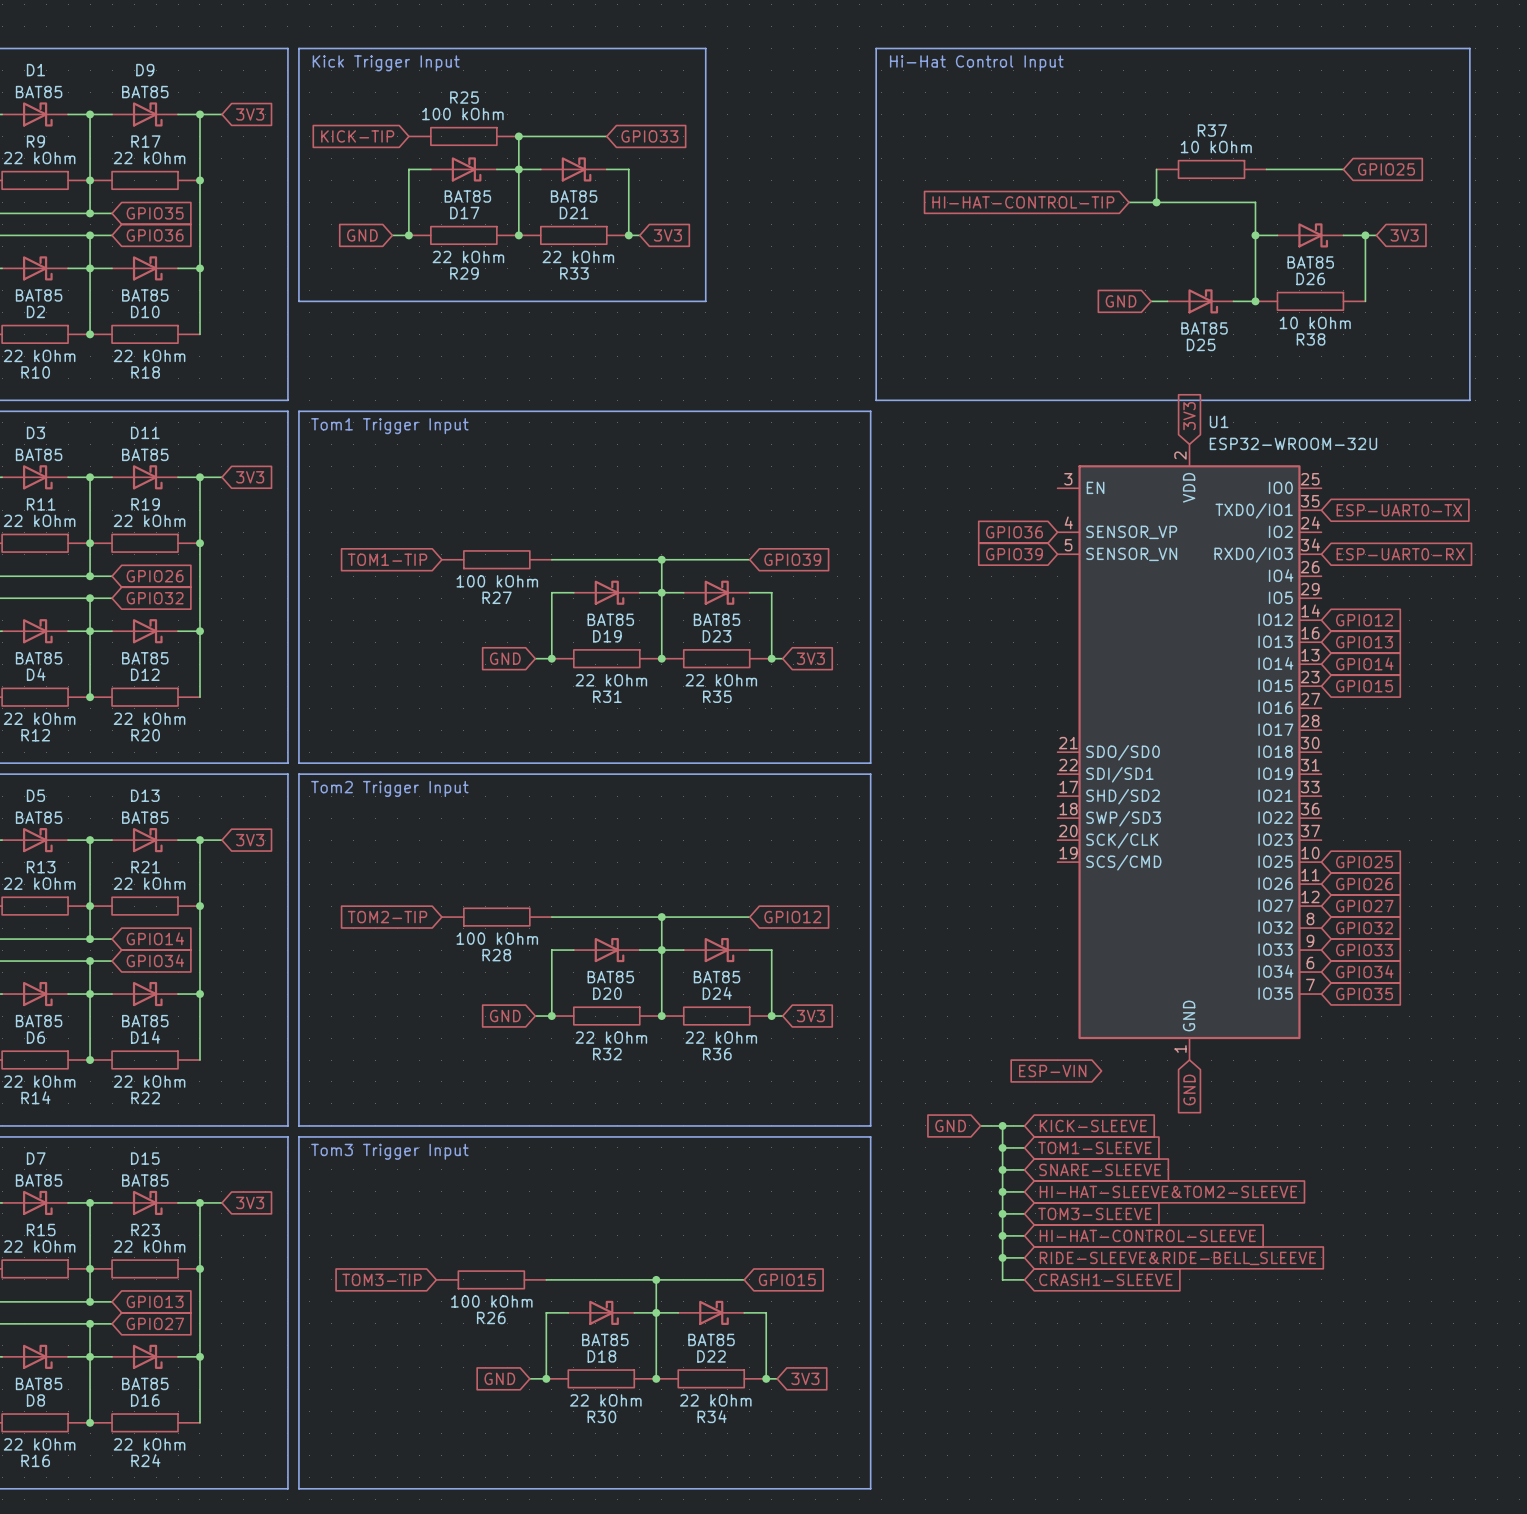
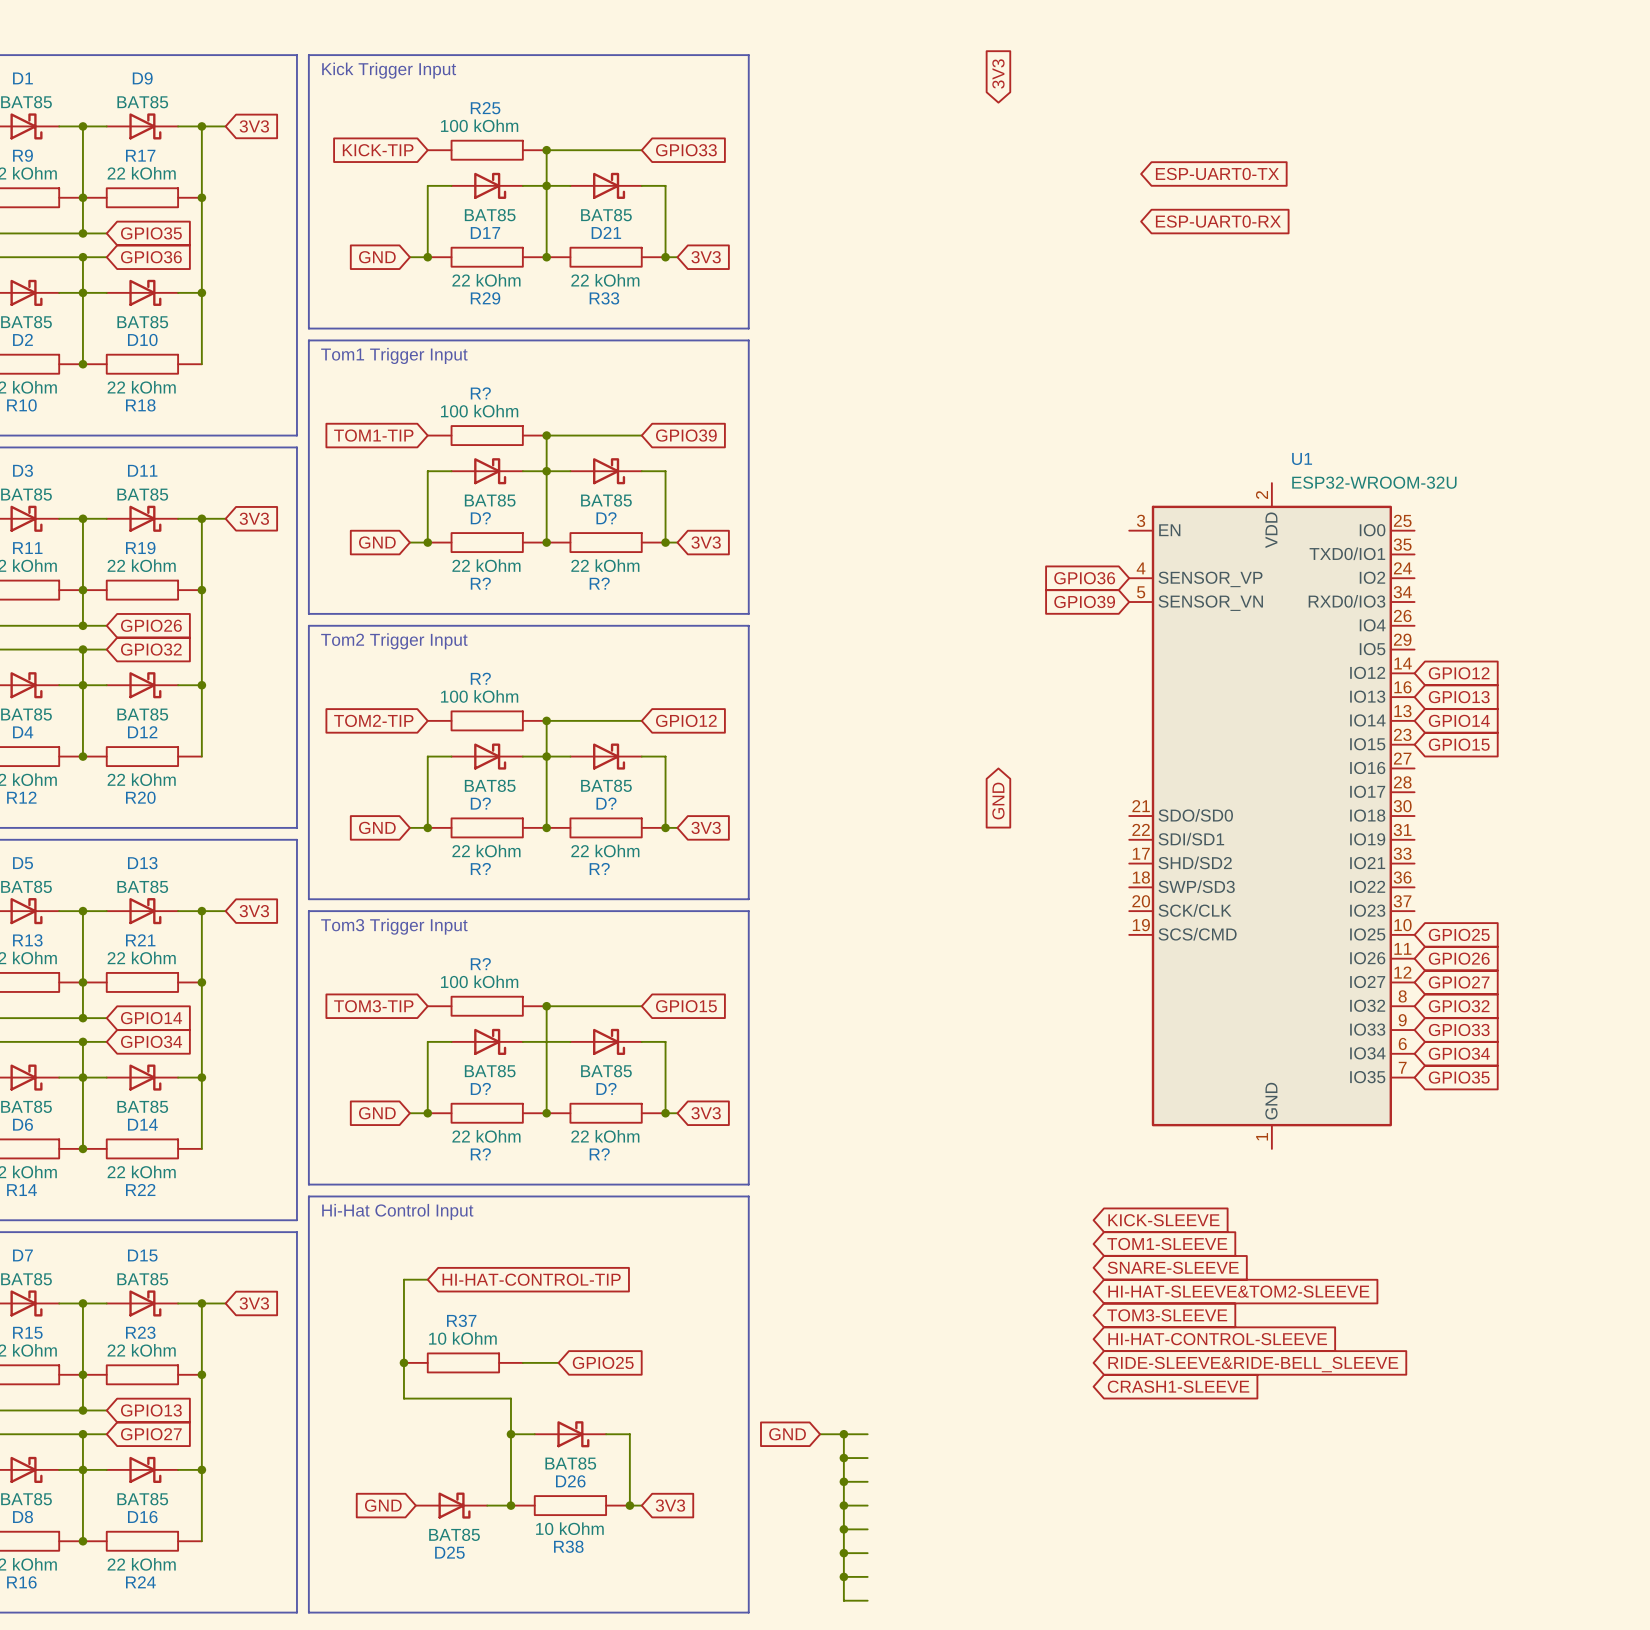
line: (876, 48) (876, 400) (1469, 400) (1469, 48) (876, 48) -> none
text: Hi-Hat Control Input (976, 63) -> none
global label: none -> 3V3 (998, 73)
global label: none -> ESP-UART0-TX (1217, 173)
wire: (1156, 169) (1156, 202) -> none
R37 position: (1211, 169) -> (463, 1362)
wire: (1266, 169) (1343, 169) -> none
global label: GPIO25 (1386, 169) -> none
global label: HI-HAT-CONTROL-TIP (1023, 202) -> none
wire: (1129, 202) (1255, 202) (1255, 301) (1233, 301) -> none
global label: none -> ESP-UART0-RX (1218, 221)
junction: (1156, 202) -> none
wire: (1255, 235) (1277, 235) -> none
junction: (1255, 235) -> none
D26 position: (1310, 235) -> (570, 1434)
wire: (1343, 235) (1376, 235) -> none
wire: (1365, 235) (1365, 301) -> none
junction: (1365, 235) -> none
global label: 3V3 (1404, 235) -> none
global label: GND (1121, 301) -> none
wire: (1151, 301) (1167, 301) -> none
D25 position: (1200, 301) -> (451, 1505)
junction: (1255, 301) -> none
R38 position: (1310, 301) -> (570, 1505)
R?: none -> 100 kOhm (487, 435)
junction: none -> (546, 435)
wire: none -> (641, 435) (546, 435) (546, 542)
line: (298, 411) (870, 411) (870, 763) (298, 763) -> (308, 839) (308, 827)
global label: 3V3 (1189, 416) -> none
text position: Tom1 Trigger Input (389, 426) -> Tom1 Trigger Input (394, 355)
wire: none -> (451, 471) (427, 471) (427, 542) (409, 542)
D?: none -> BAT85 (487, 471)
wire: none -> (522, 471) (570, 471)
junction: none -> (546, 471)
D?: none -> BAT85 (606, 471)
wire: none -> (641, 471) (665, 471) (665, 542) (677, 542)
global label: none -> GND (377, 542)
junction: none -> (427, 542)
R?: none -> 22 kOhm (487, 542)
junction: none -> (546, 542)
R?: none -> 22 kOhm (606, 542)
junction: none -> (665, 542)
global label: none -> 3V3 (706, 542)
global label: ESP-UART0-TX (1399, 510) -> none
global label: ESP-UART0-RX (1400, 554) -> none
global label position: TOM1-TIP (387, 559) -> TOM1-TIP (373, 435)
R27: 100 kOhm (496, 559) -> none
wire: (551, 559) (749, 559) -> none
wire: (661, 559) (661, 658) -> none
junction: (661, 559) -> none
global label position: GPIO39 (792, 559) -> GPIO39 (686, 435)
line: (298, 565) (298, 576) -> (308, 613) (748, 613) (748, 340) (308, 340) (308, 447)
wire: (573, 592) (551, 592) (551, 658) (535, 658) -> (451, 756) (427, 756) (427, 827) (409, 827)
D19: BAT85 (606, 592) -> none
wire: (639, 592) (683, 592) -> (522, 756) (570, 756)
junction: (661, 592) -> none
D23: BAT85 (716, 592) -> none
wire: (749, 592) (771, 592) (771, 658) (782, 658) -> (641, 756) (665, 756) (665, 827) (677, 827)
global label: GND (505, 658) -> none
junction: (551, 658) -> none
R31: 22 kOhm (606, 658) -> none
junction: (661, 658) -> none
R35: 22 kOhm (716, 658) -> none
junction: (771, 658) -> none
global label: 3V3 (810, 658) -> none
global label: none -> TOM2-TIP (373, 720)
R?: none -> 100 kOhm (487, 720)
junction: none -> (546, 720)
wire: none -> (641, 720) (546, 720) (546, 827)
global label: none -> GPIO12 (686, 720)
D?: none -> BAT85 (487, 756)
junction: none -> (546, 756)
D?: none -> BAT85 (606, 756)
global label: none -> GND (998, 801)
global label: none -> GND (377, 827)
junction: none -> (427, 827)
R?: none -> 22 kOhm (487, 827)
junction: none -> (546, 827)
R?: none -> 22 kOhm (606, 827)
junction: none -> (665, 827)
global label: none -> 3V3 (706, 827)
line: (298, 774) (870, 774) (870, 1125) (298, 1125) -> (308, 1232) (308, 1220)
text position: Tom2 Trigger Input (389, 788) -> Tom2 Trigger Input (394, 641)
line: (298, 829) (298, 840) -> (308, 899) (748, 899) (748, 625) (308, 625)
text: none -> Tom3 Trigger Input (394, 926)
global label: TOM2-TIP (387, 917) -> TOM3-TIP (373, 1006)
R28: 100 kOhm (496, 917) -> none
wire: (551, 917) (749, 917) -> none
wire: (661, 917) (661, 1016) -> none
junction: (661, 917) -> none
global label: GPIO12 (792, 917) -> none
R?: none -> 100 kOhm (487, 1006)
junction: none -> (546, 1006)
wire: none -> (641, 1006) (546, 1006) (546, 1113)
global label: none -> GPIO15 (686, 1006)
wire: (573, 950) (551, 950) (551, 1016) (535, 1016) -> (451, 1041) (427, 1041) (427, 1113) (409, 1113)
D20: BAT85 (606, 950) -> none
wire: (639, 950) (683, 950) -> (522, 1041) (570, 1041)
junction: (661, 950) -> none
D24: BAT85 (716, 950) -> none
wire: (749, 950) (771, 950) (771, 1016) (782, 1016) -> (641, 1041) (665, 1041) (665, 1113) (677, 1113)
D?: none -> BAT85 (487, 1041)
D?: none -> BAT85 (606, 1041)
global label position: GND (505, 1016) -> GND (377, 1113)
junction position: (551, 1016) -> (546, 1113)
R32: 22 kOhm (606, 1016) -> none
junction position: (661, 1016) -> (665, 1113)
R36: 22 kOhm (716, 1016) -> none
junction: (771, 1016) -> none
global label position: 3V3 (810, 1016) -> 3V3 (706, 1113)
junction: none -> (427, 1113)
R?: none -> 22 kOhm (487, 1113)
R?: none -> 22 kOhm (606, 1113)
global label: ESP-VIN (1052, 1071) -> none
global label: GND (1189, 1089) -> none
line: (298, 1092) (298, 1103) -> (308, 1184) (748, 1184) (748, 911) (308, 911)
text: none -> Hi-Hat Control Input (397, 1211)
global label: GND (950, 1125) -> none
wire: (980, 1125) (1024, 1125) -> none
wire: (1002, 1125) (1002, 1279) (1024, 1279) -> none
junction: (1002, 1125) -> none
line: (298, 1136) (870, 1136) (870, 1488) (705, 1488) -> (308, 1196) (748, 1196) (748, 1612)
wire: (1002, 1147) (1024, 1147) -> none
junction: (1002, 1147) -> none
text: Tom3 Trigger Input (389, 1151) -> none
wire: (1002, 1169) (1024, 1169) -> none
junction: (1002, 1169) -> none
wire: none -> (427, 1279) (403, 1279) (403, 1398) (510, 1398) (510, 1505) (487, 1505)
global label: none -> HI-HAT-CONTROL-TIP (531, 1279)
wire: (1002, 1191) (1024, 1191) -> none
junction: (1002, 1191) -> none
wire: (1002, 1213) (1024, 1213) -> none
junction: (1002, 1213) -> none
wire: (1002, 1235) (1024, 1235) -> none
junction: (1002, 1235) -> none
junction: none -> (403, 1362)
wire: none -> (522, 1362) (558, 1362)
global label: none -> GPIO25 (603, 1362)
wire: (1002, 1257) (1024, 1257) -> none
junction: (1002, 1257) -> none
global label: TOM3-TIP (382, 1279) -> none
R26: 100 kOhm (491, 1279) -> none
wire: (546, 1279) (744, 1279) -> none
wire: (656, 1279) (656, 1378) -> none
junction: (656, 1279) -> none
global label: GPIO15 (787, 1279) -> none
wire: (568, 1312) (546, 1312) (546, 1378) (529, 1378) -> none
D18: BAT85 (601, 1312) -> none
wire: (634, 1312) (678, 1312) -> (820, 1434) (867, 1434)
junction: (656, 1312) -> none
D22: BAT85 (711, 1312) -> none
wire: (744, 1312) (766, 1312) (766, 1378) (777, 1378) -> (606, 1434) (629, 1434) (629, 1505) (641, 1505)
wire: none -> (510, 1434) (534, 1434)
junction: none -> (510, 1434)
global label: none -> GND (787, 1434)
wire: none -> (843, 1434) (843, 1600) (867, 1600)
junction: none -> (843, 1434)
wire: none -> (843, 1458) (867, 1458)
junction: none -> (843, 1458)
junction: none -> (843, 1481)
global label: GND (499, 1378) -> none
junction: (546, 1378) -> none
R30: 22 kOhm (601, 1378) -> none
junction: (656, 1378) -> none
R34: 22 kOhm (711, 1378) -> none
junction: (766, 1378) -> none
global label position: 3V3 (805, 1378) -> 3V3 (670, 1505)
global label: none -> GND (383, 1505)
junction: none -> (510, 1505)
junction: none -> (629, 1505)
junction: none -> (843, 1505)
wire: none -> (843, 1529) (867, 1529)
junction: none -> (843, 1529)
wire: none -> (843, 1553) (867, 1553)
junction: none -> (843, 1553)
wire: none -> (843, 1576) (867, 1576)
junction: none -> (843, 1576)

